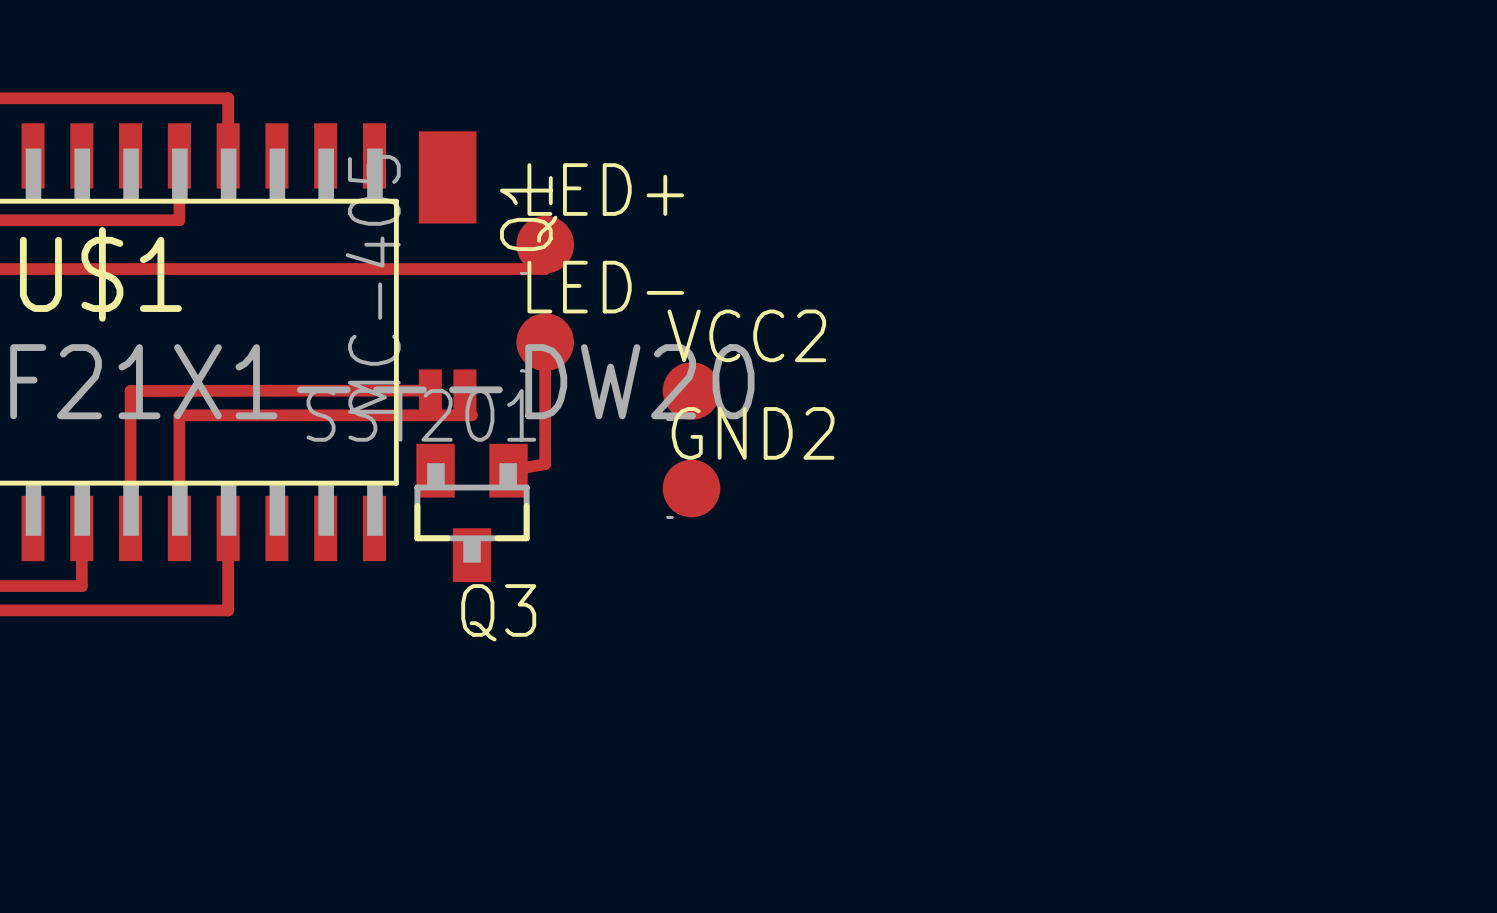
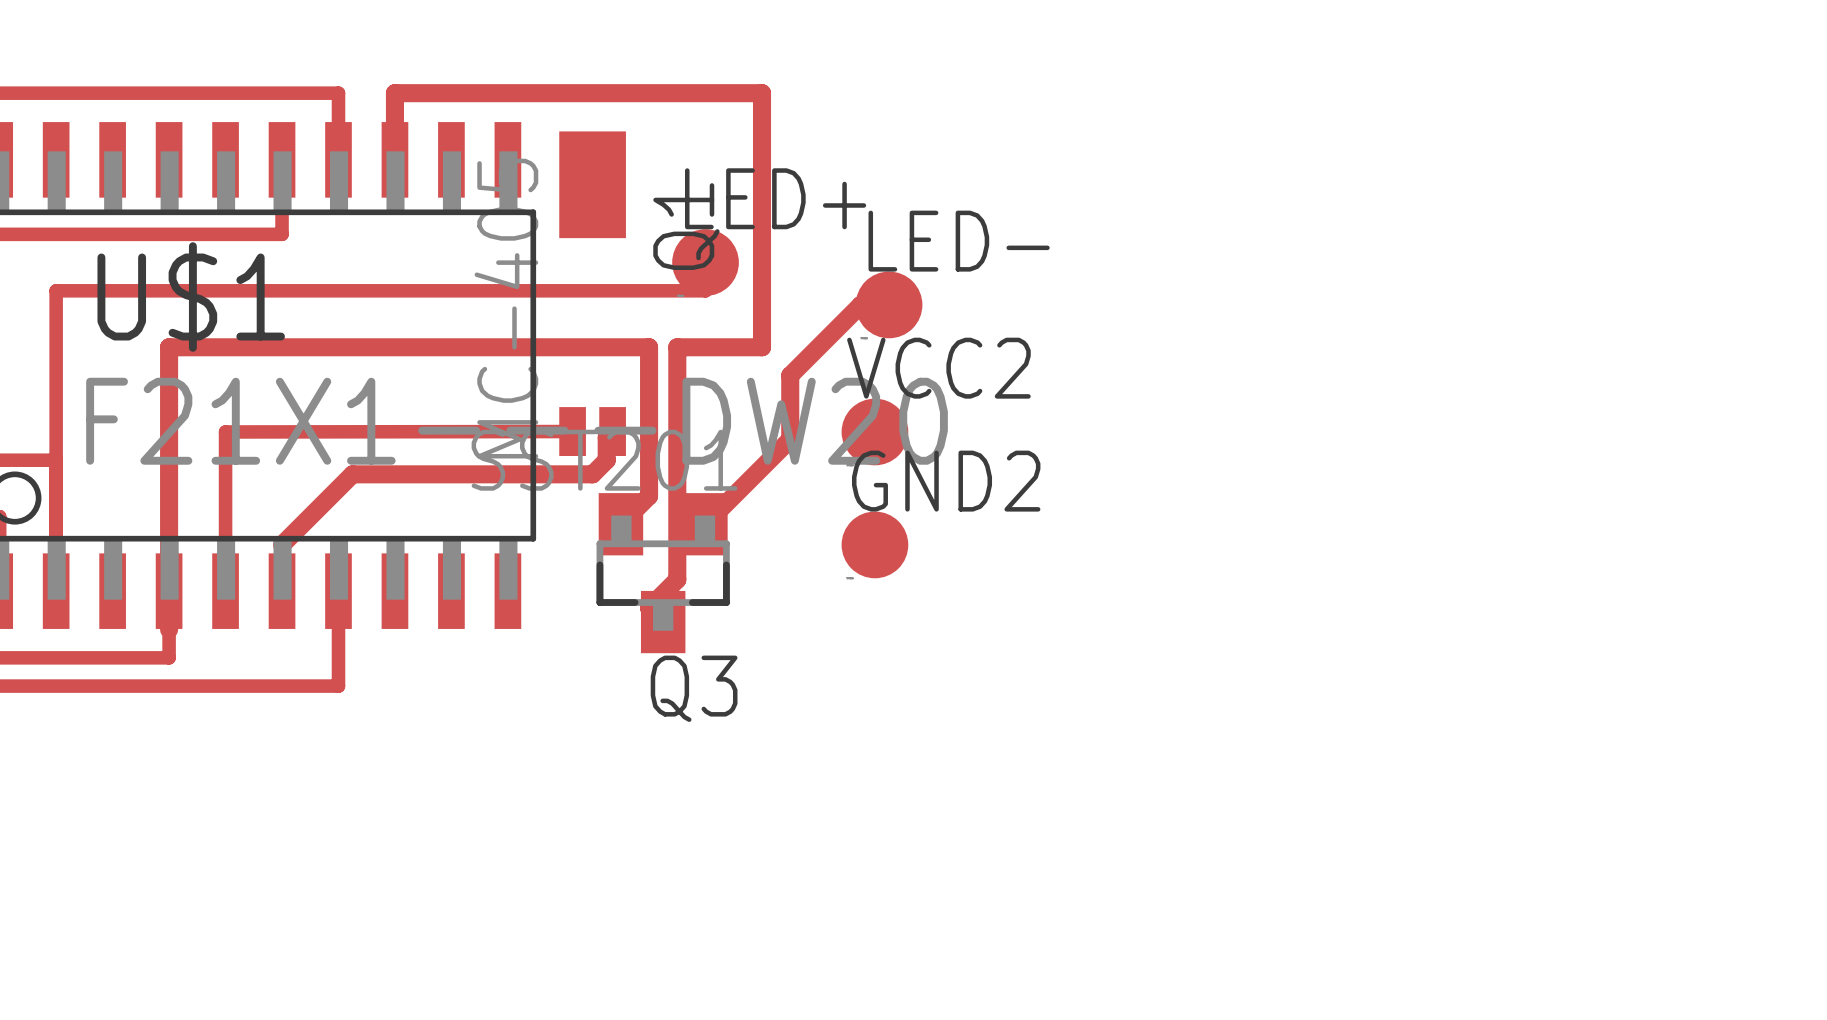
track: none -> (394, 159) (394, 93) (762, 93) (762, 347) (677, 347) (677, 579) (649, 607) (663, 622)
track: none -> (889, 304) (860, 304) (790, 375) (790, 439) (705, 524)
track: (545, 342) (545, 464) (508, 470) -> none
LED- position: (545, 342) -> (889, 304)
track: (472, 415) (179, 415) (179, 488) -> (612, 431) (606, 437) (606, 460) (592, 474) (352, 474) (282, 544)
track: none -> (620, 524) (649, 496) (649, 347) (169, 347) (169, 629)
Q3 position: (472, 512) -> (663, 573)

